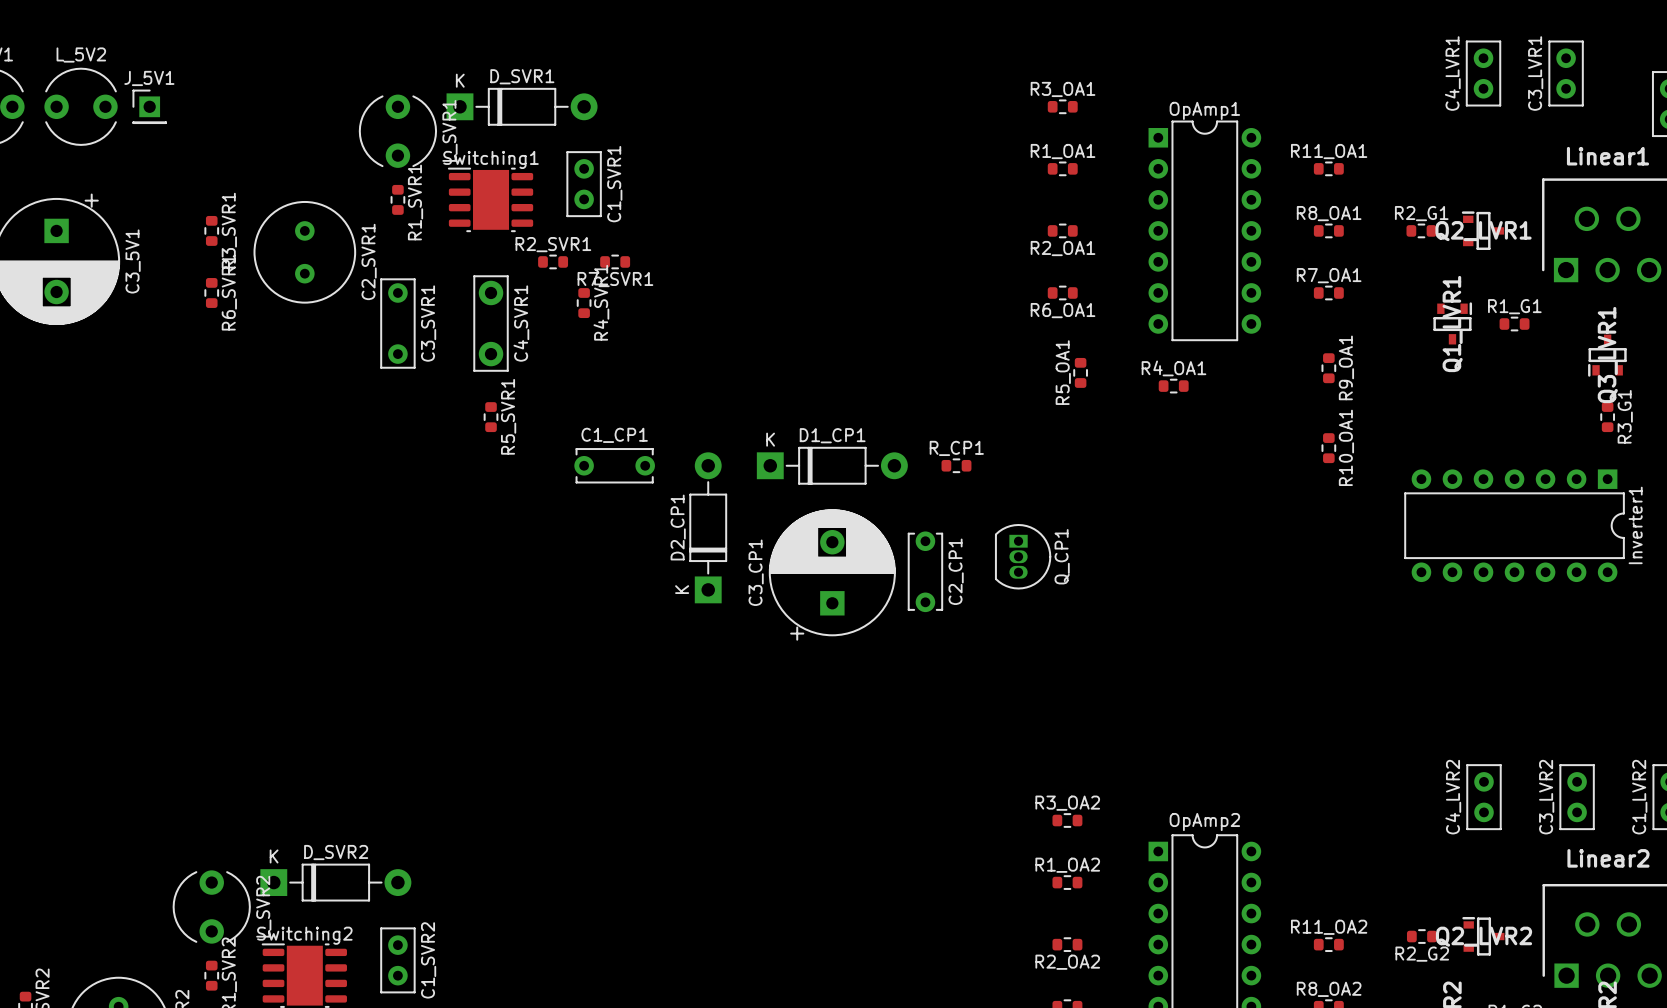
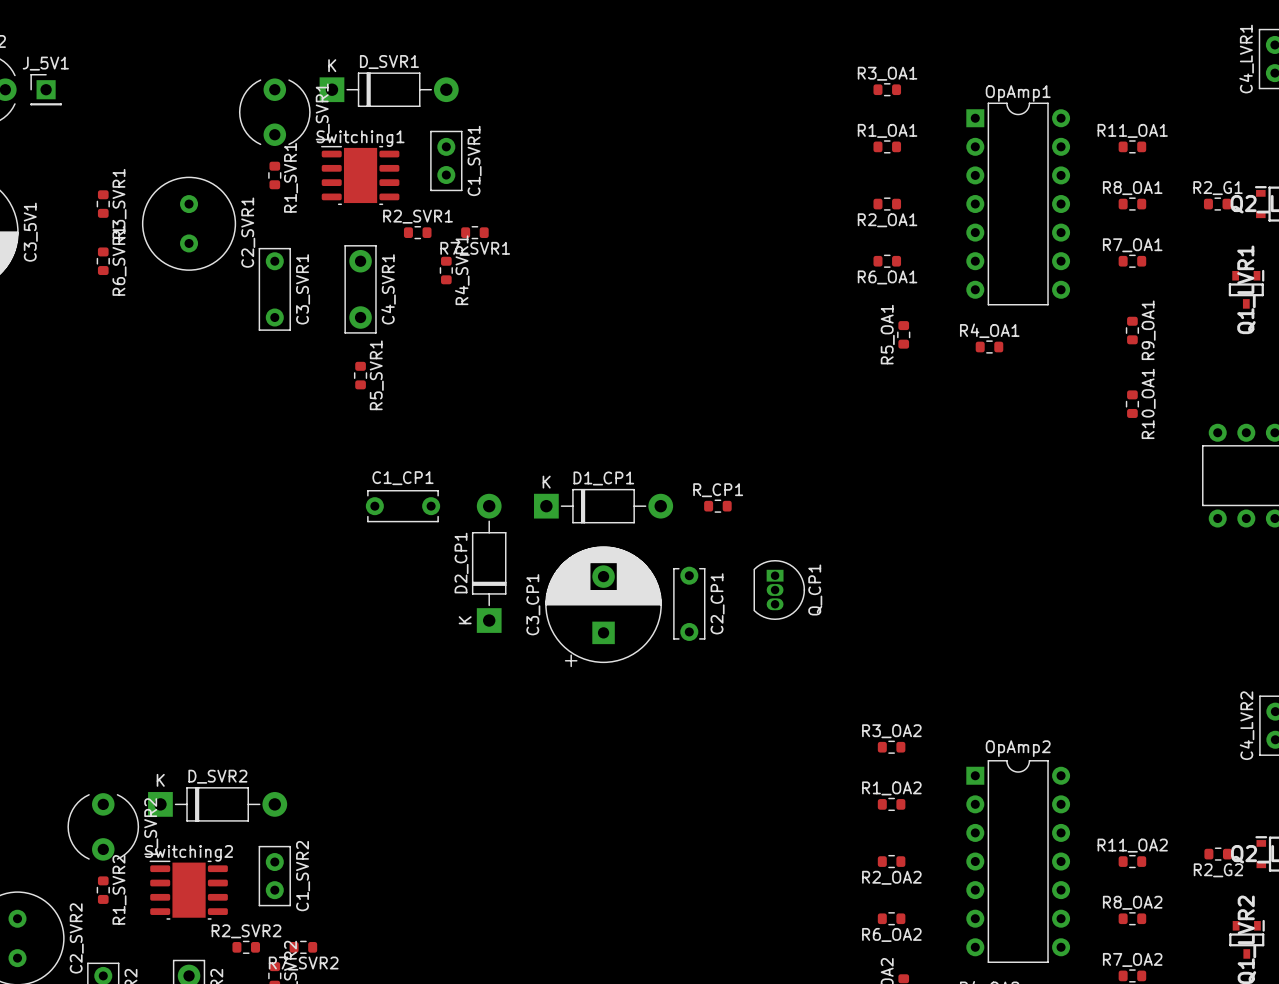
C1_CP1 position: (614, 465) -> (402, 506)
D1_CP1 position: (832, 465) -> (603, 506)
R_CP1 position: (956, 465) -> (717, 506)
D2_CP1 position: (708, 527) -> (489, 563)
Q_CP1 position: (1023, 556) -> (779, 589)
C2_CP1 position: (925, 571) -> (689, 603)
C3_CP1 position: (832, 574) -> (603, 606)

